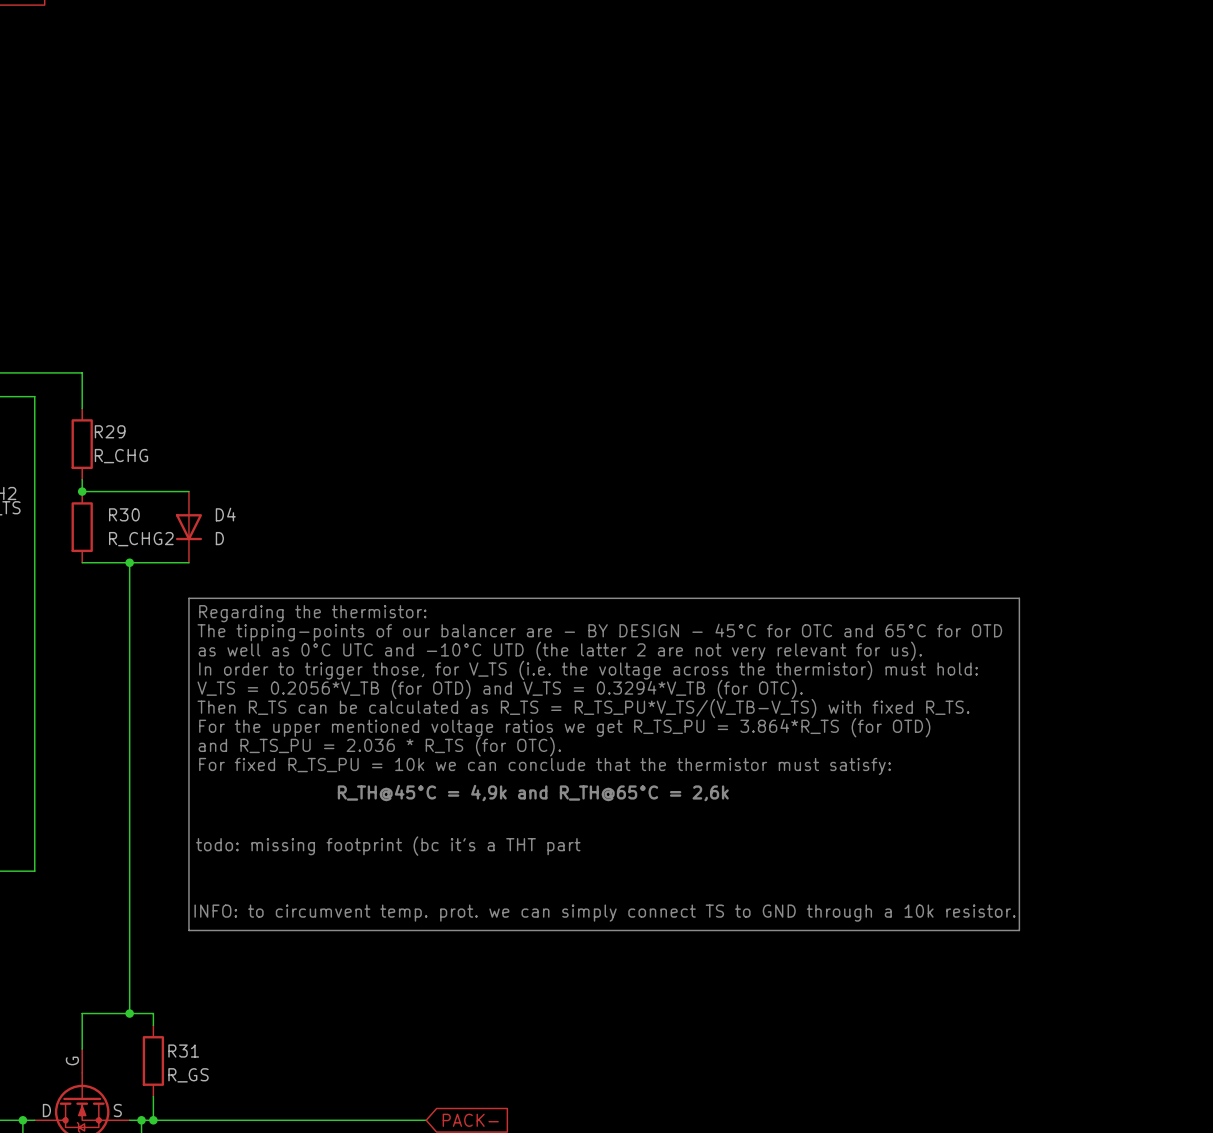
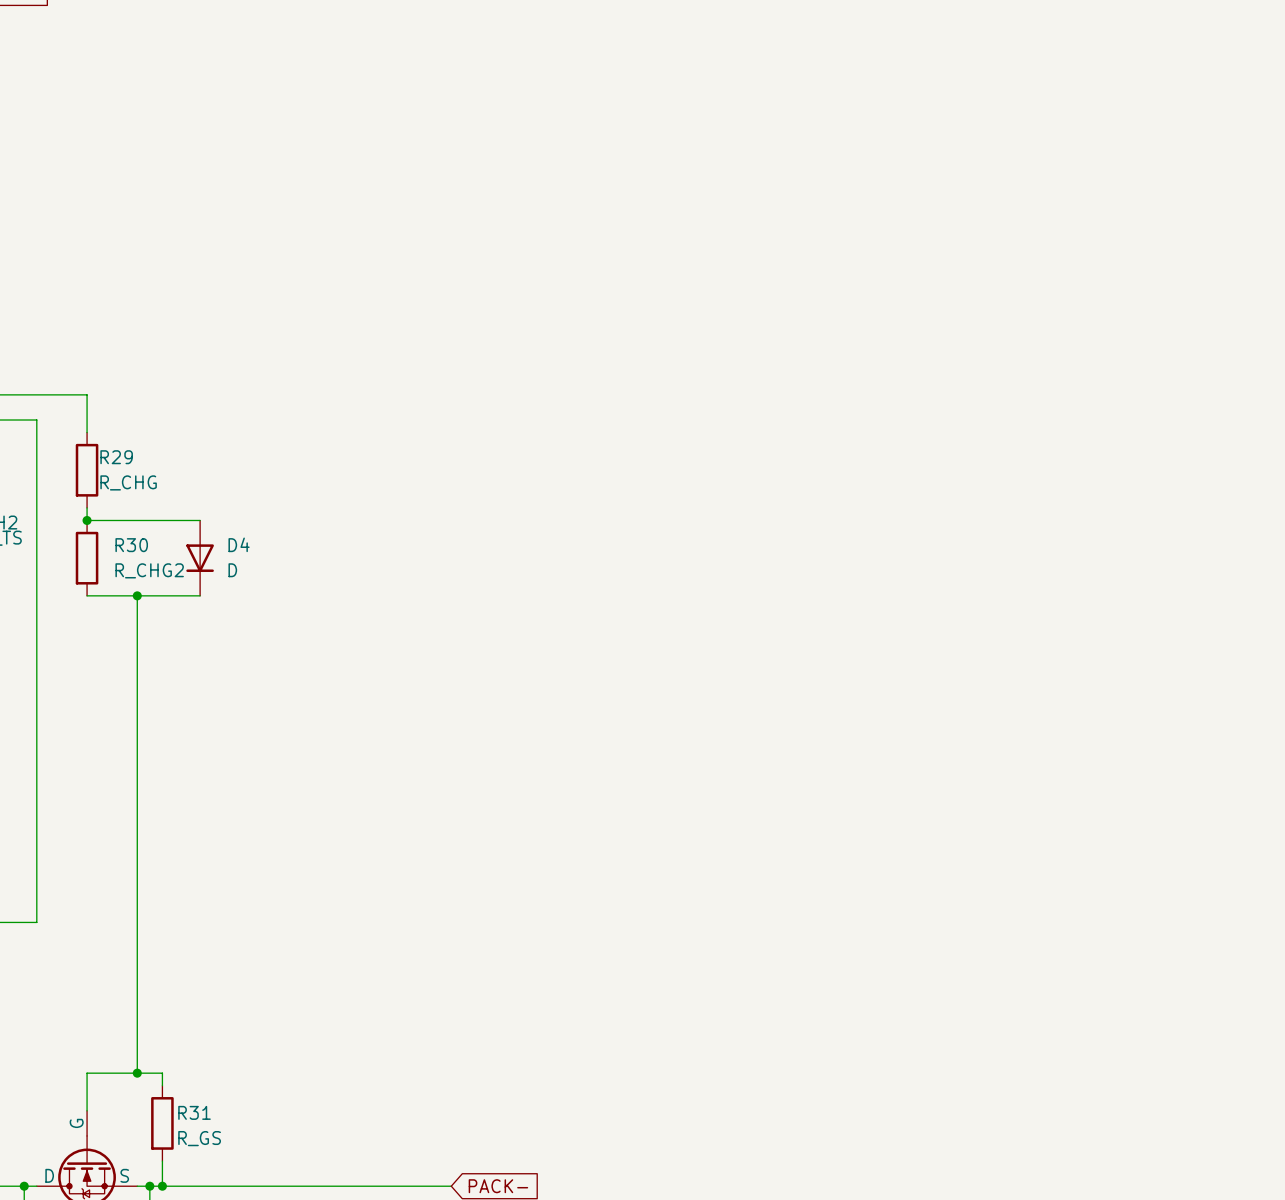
line: (188, 598) (1019, 598) (1019, 930) (188, 930) (188, 598) -> none
text: Regarding the thermistor: (312, 613) -> none
text: The tipping-points of our balancer are - BY DESIGN - 45°C for OTC and 65°C for OTD (599, 632) -> none
text: as well as 0°C UTC and -10°C UTD (the latter 2 are not very relevant for us). (560, 651) -> none
text: In order to trigger those, for V_TS (i.e. the voltage across the thermistor) must hold: (588, 670) -> none
text: V_TS = 0.2056*V_TB (for OTD) and V_TS = 0.3294*V_TB (for OTC). (500, 689) -> none
text: Then R_TS can be calculated as R_TS = R_TS_PU*V_TS/(V_TB-V_TS) with fixed R_TS. (583, 708) -> none
text: For the upper mentioned voltage ratios we get R_TS_PU = 3.864*R_TS (for OTD) (564, 727) -> none
text: and R_TS_PU = 2.036 * R_TS (for OTC). (379, 746) -> none
text: For fixed R_TS_PU = 10k we can conclude that the thermistor must satisfy: (545, 766) -> none
text: R_TH@45°C = 4,9k and R_TH@65°C = 2,6k (533, 793) -> none
text: todo: missing footprint (bc it's a THT part (388, 846) -> none
text: INFO: to circumvent temp. prot. we can simply connect TS to GND through a 10k resistor. (604, 913) -> none

